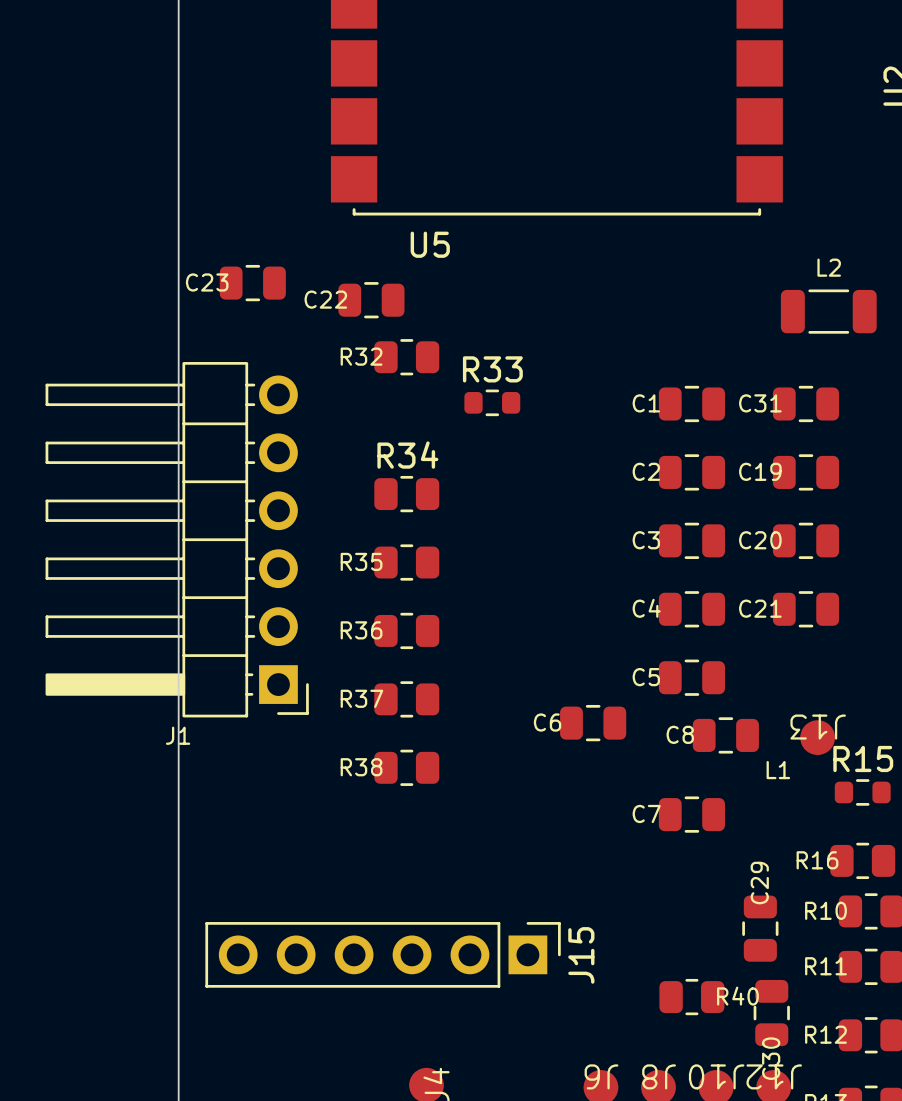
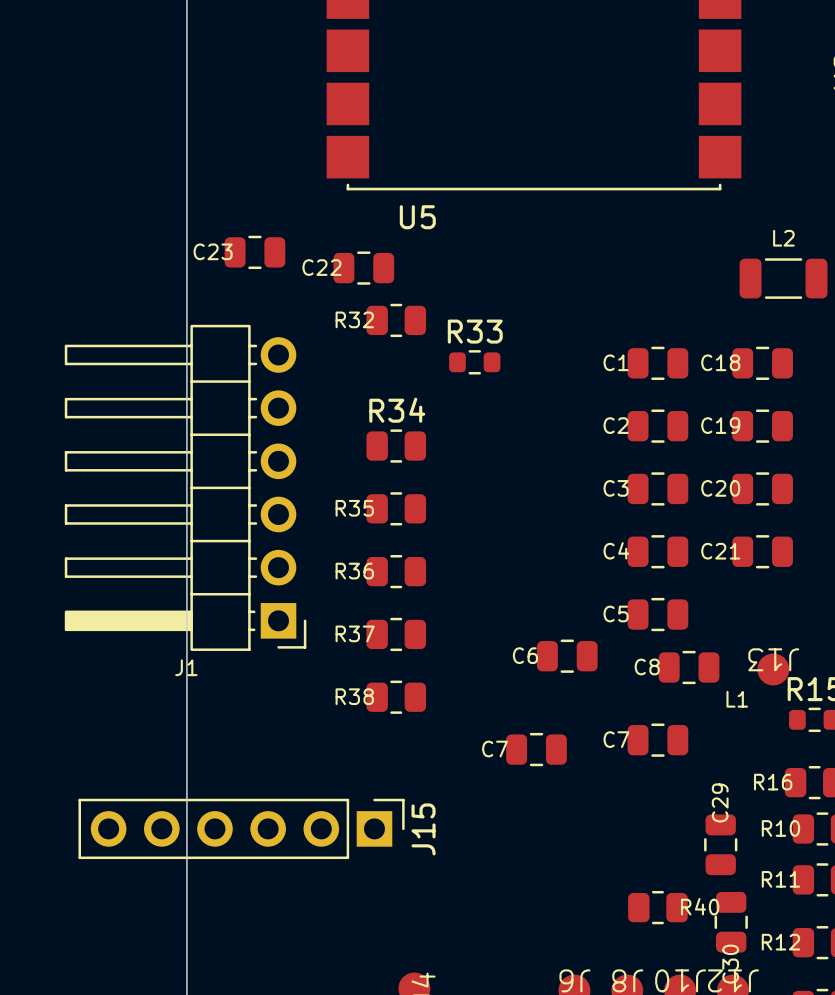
C31 name: C31 (760, 403) -> C18 (720, 362)
C7: none -> (536, 749)
J15 position: (383, 954) -> (241, 828)

